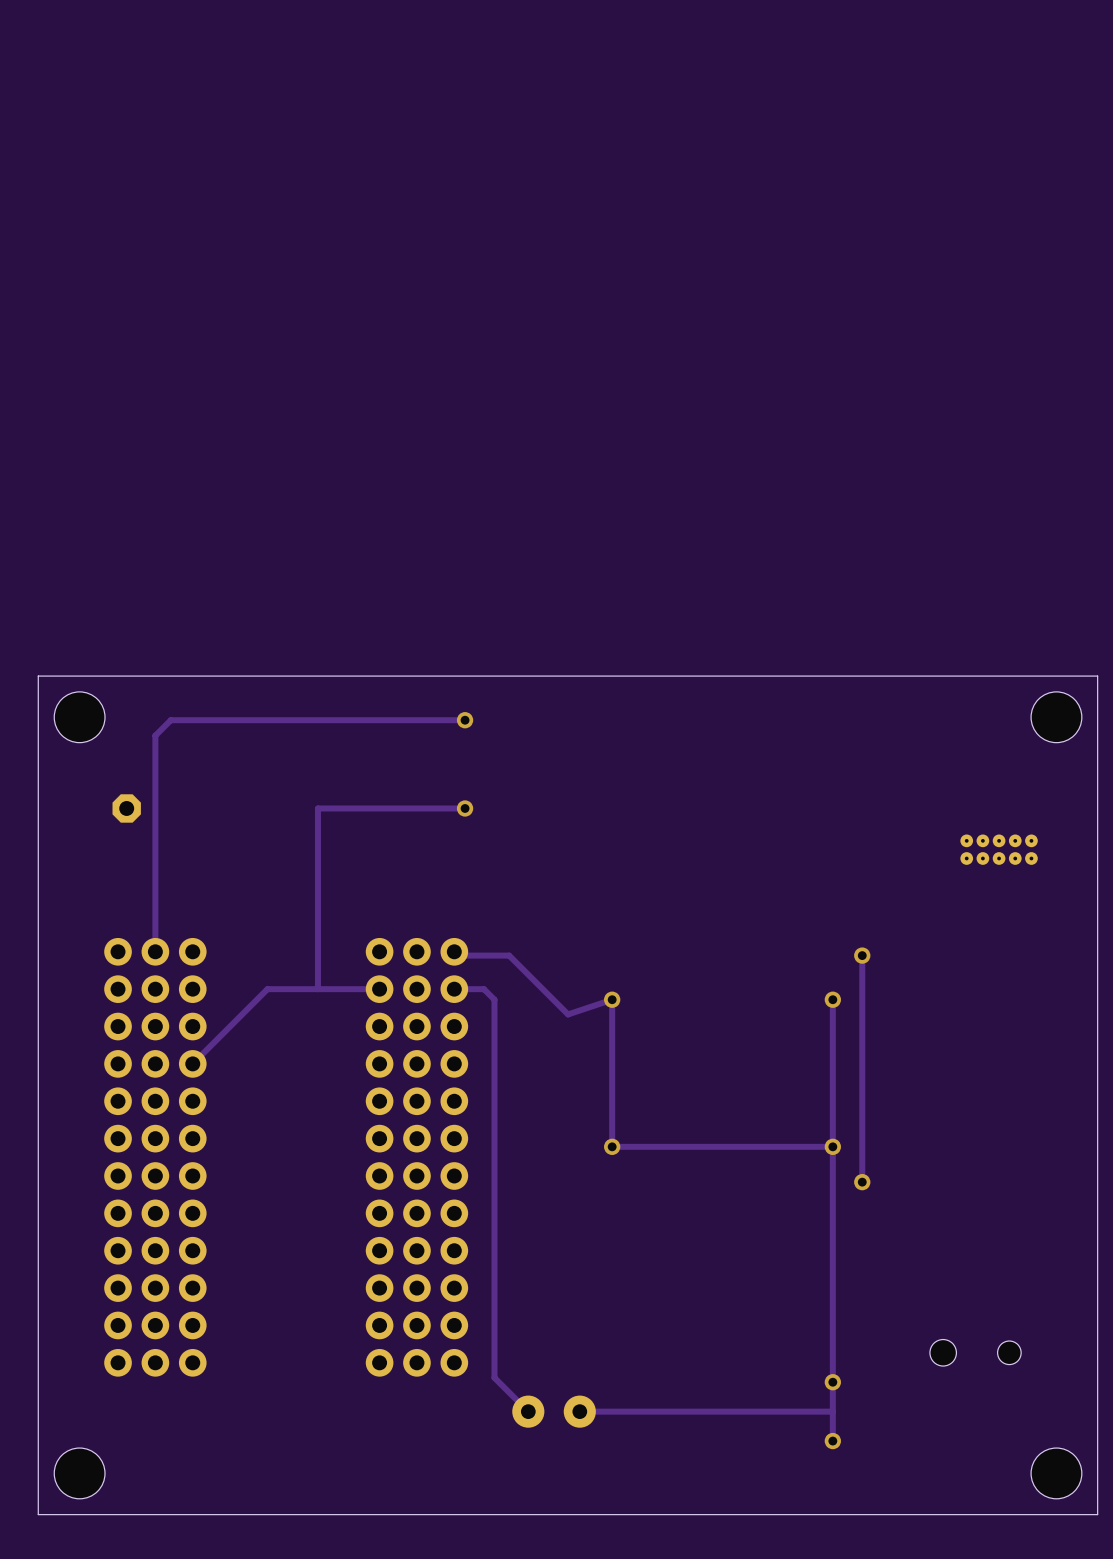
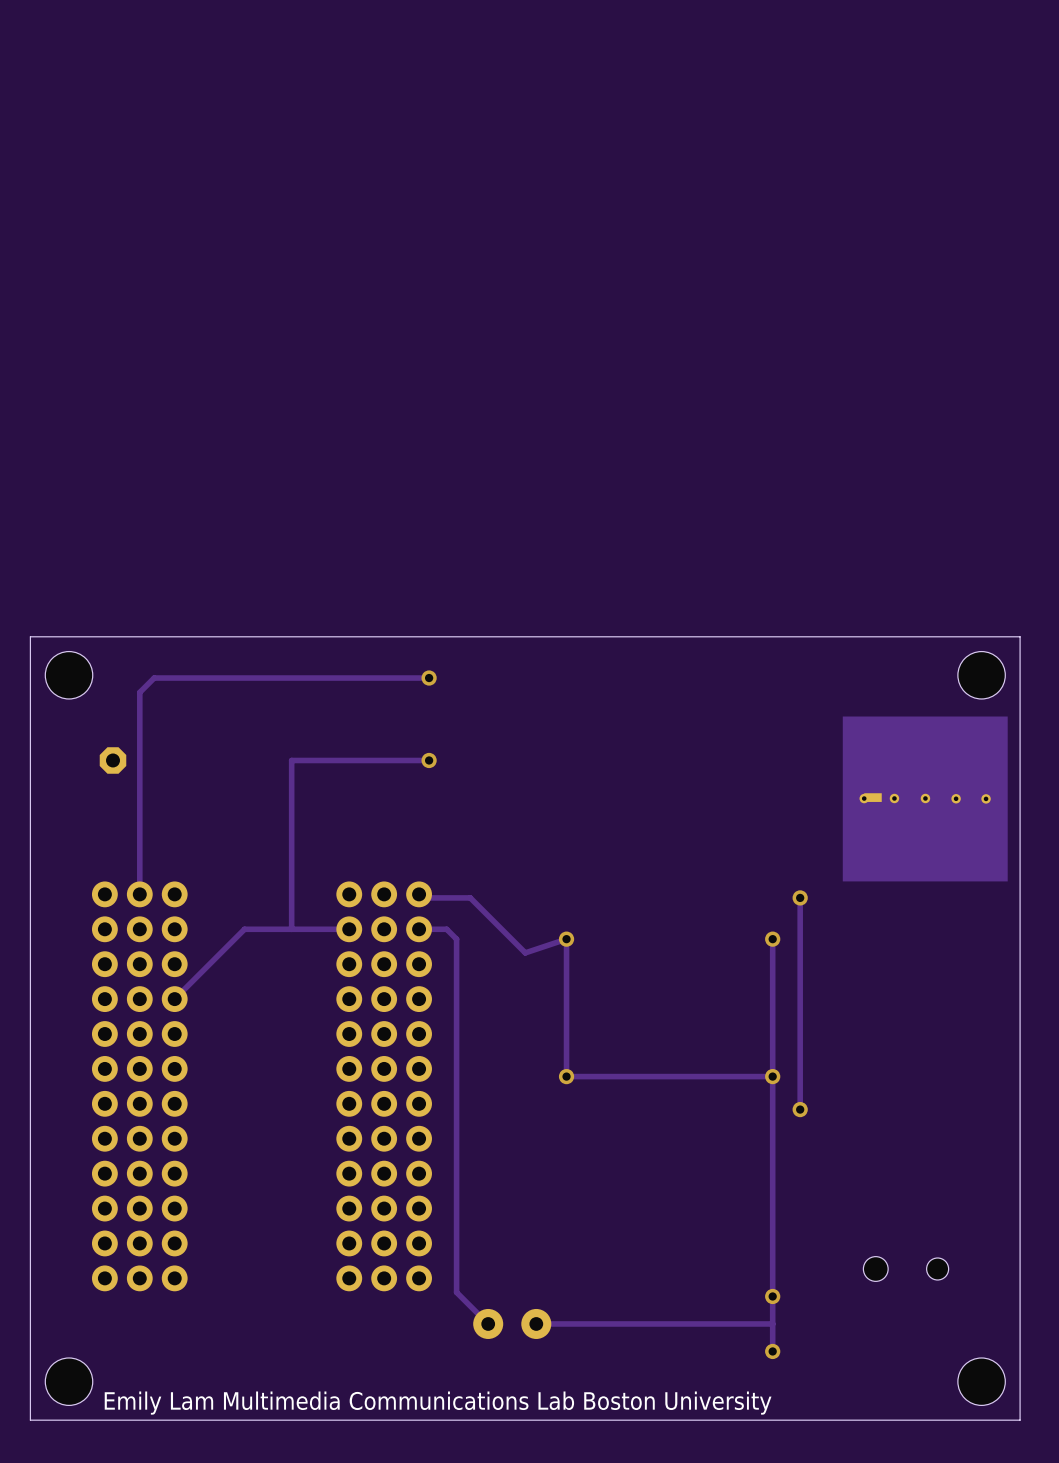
part footprint: [960, 834, 1038, 865] -> [842, 716, 1008, 882]
text: none -> Emily Lam Multimedia Communications Lab Boston University (438, 1403)

